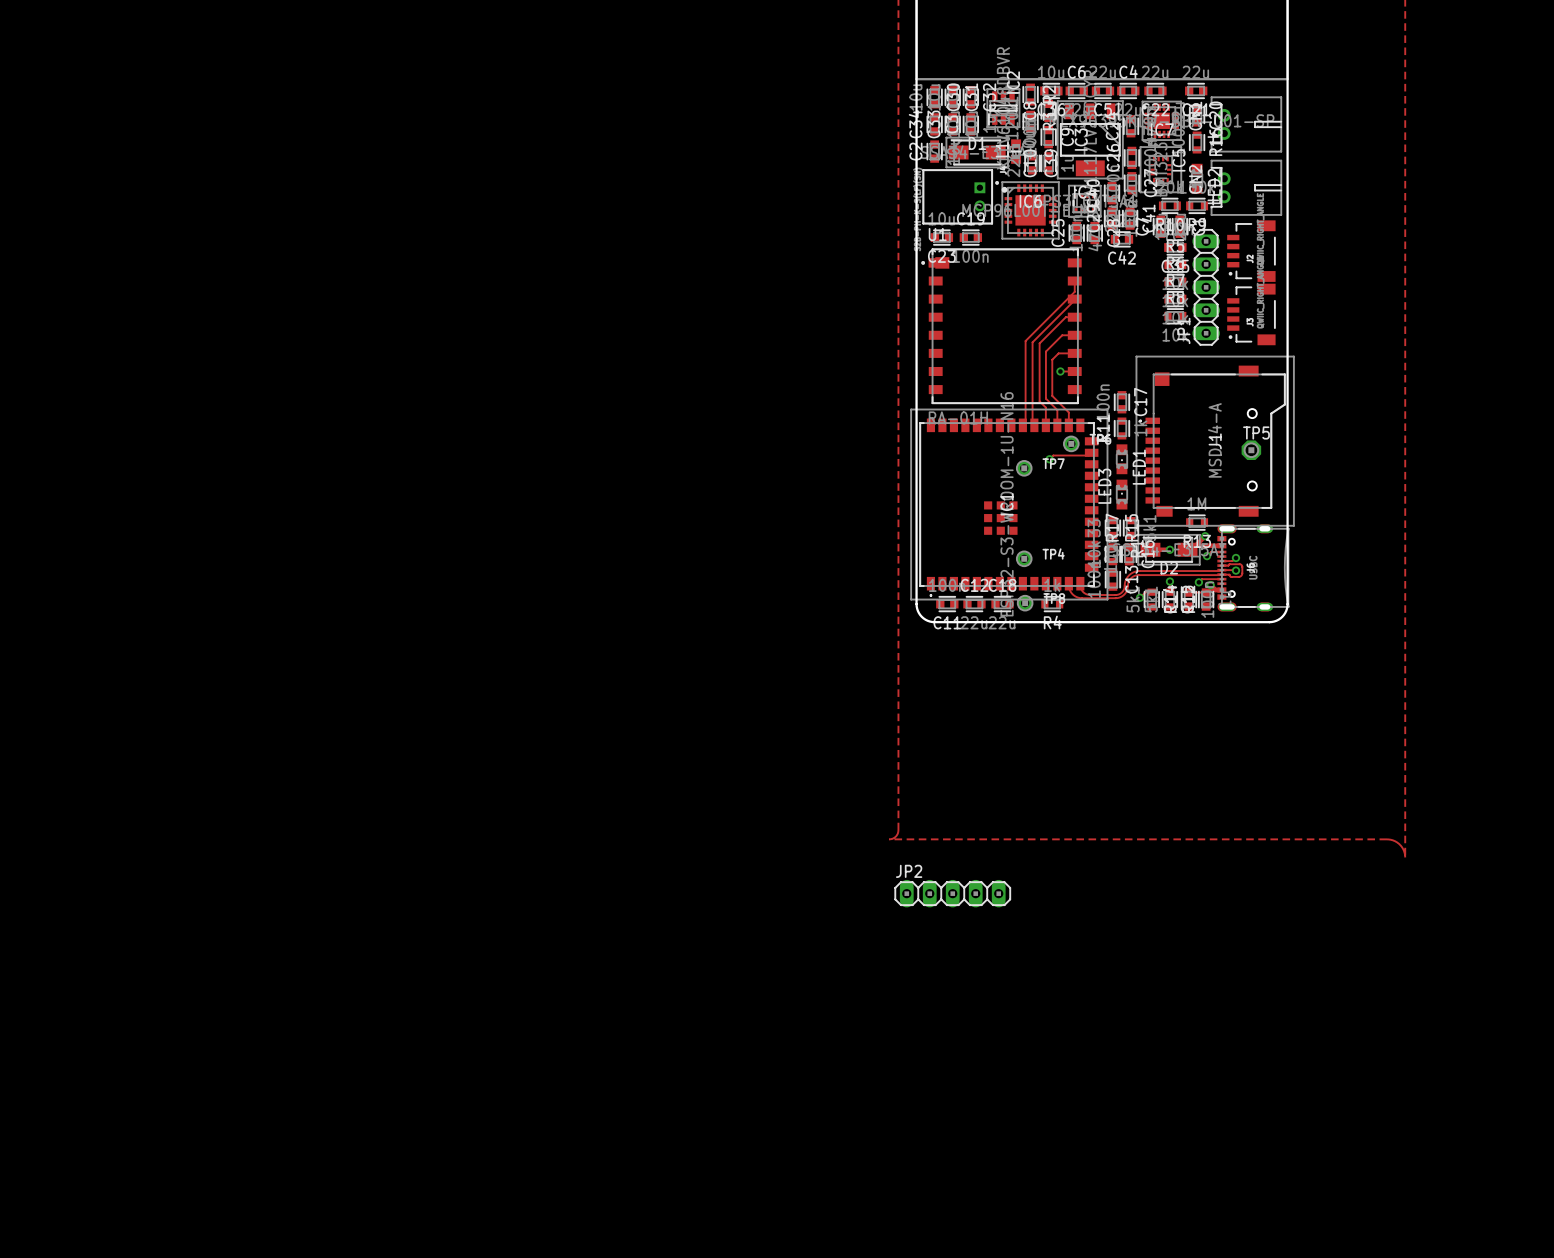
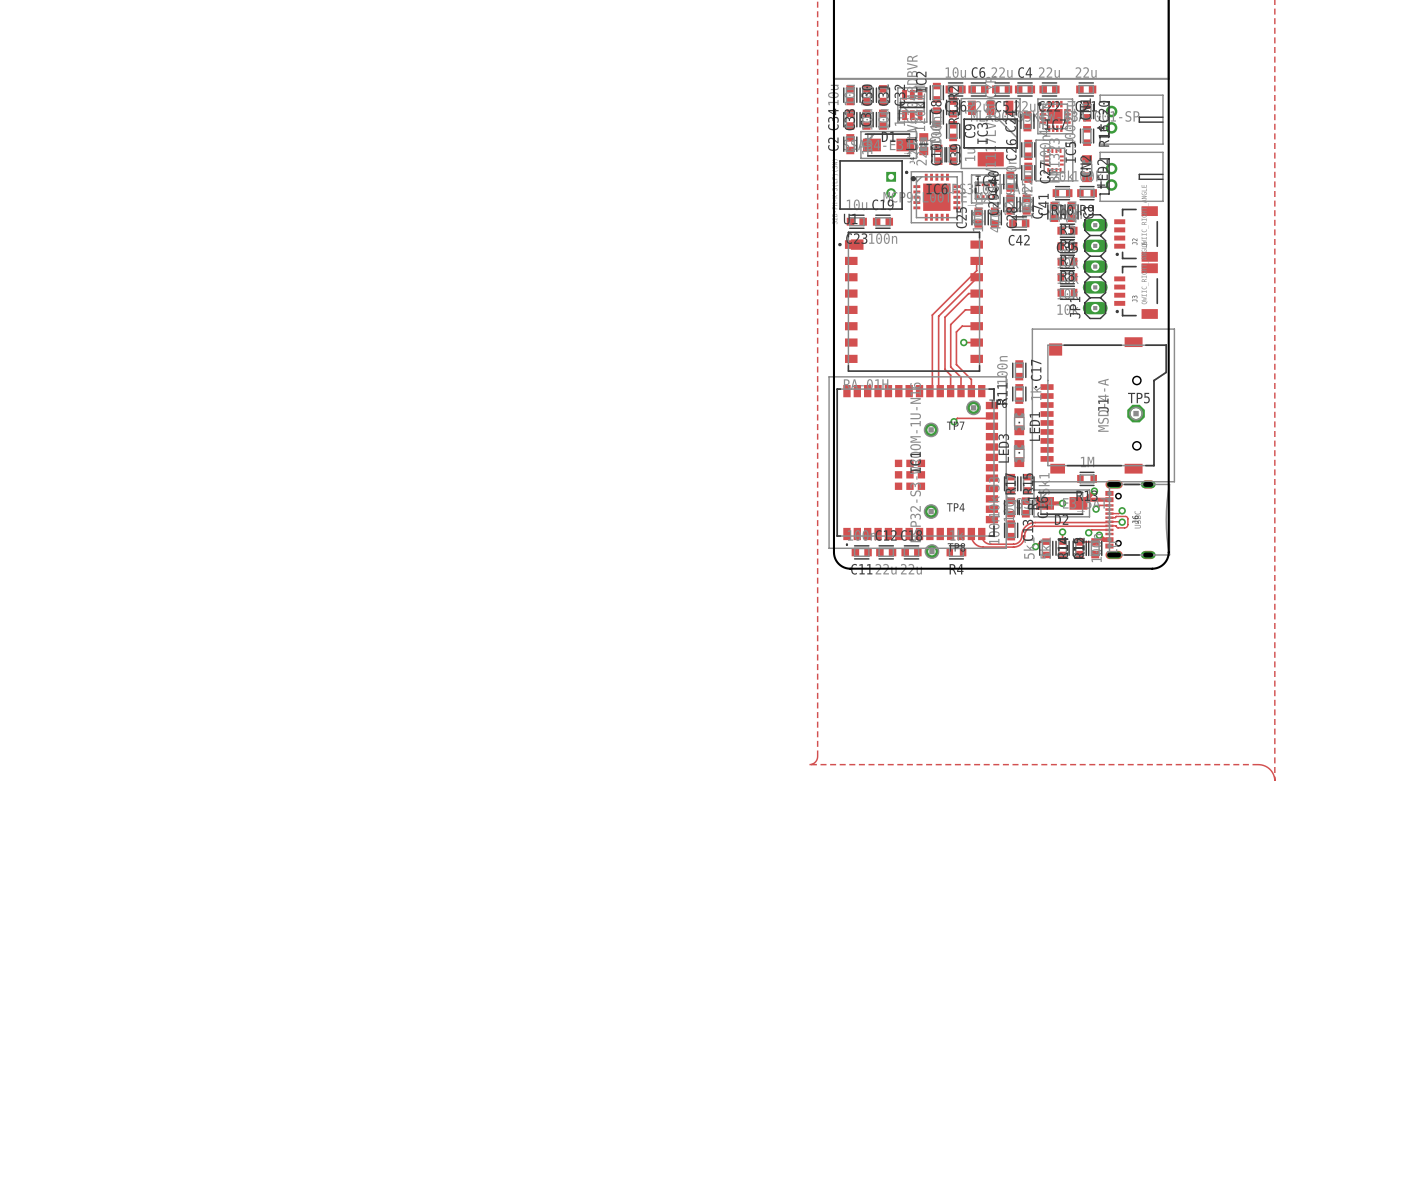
JP2: (952, 893) -> none

